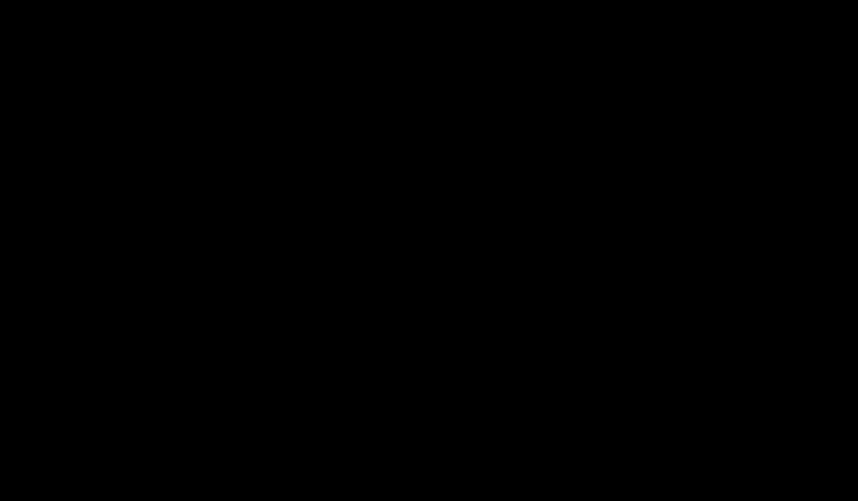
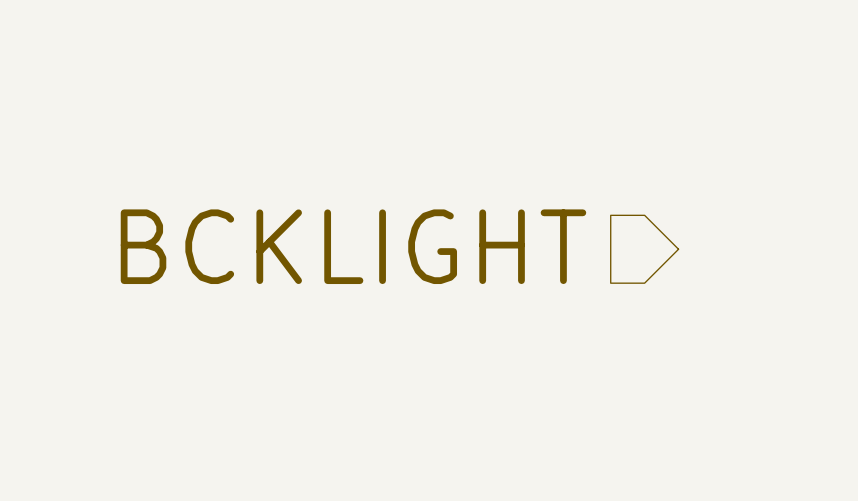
hierarchical label: none -> BCKLIGHT (353, 246)

